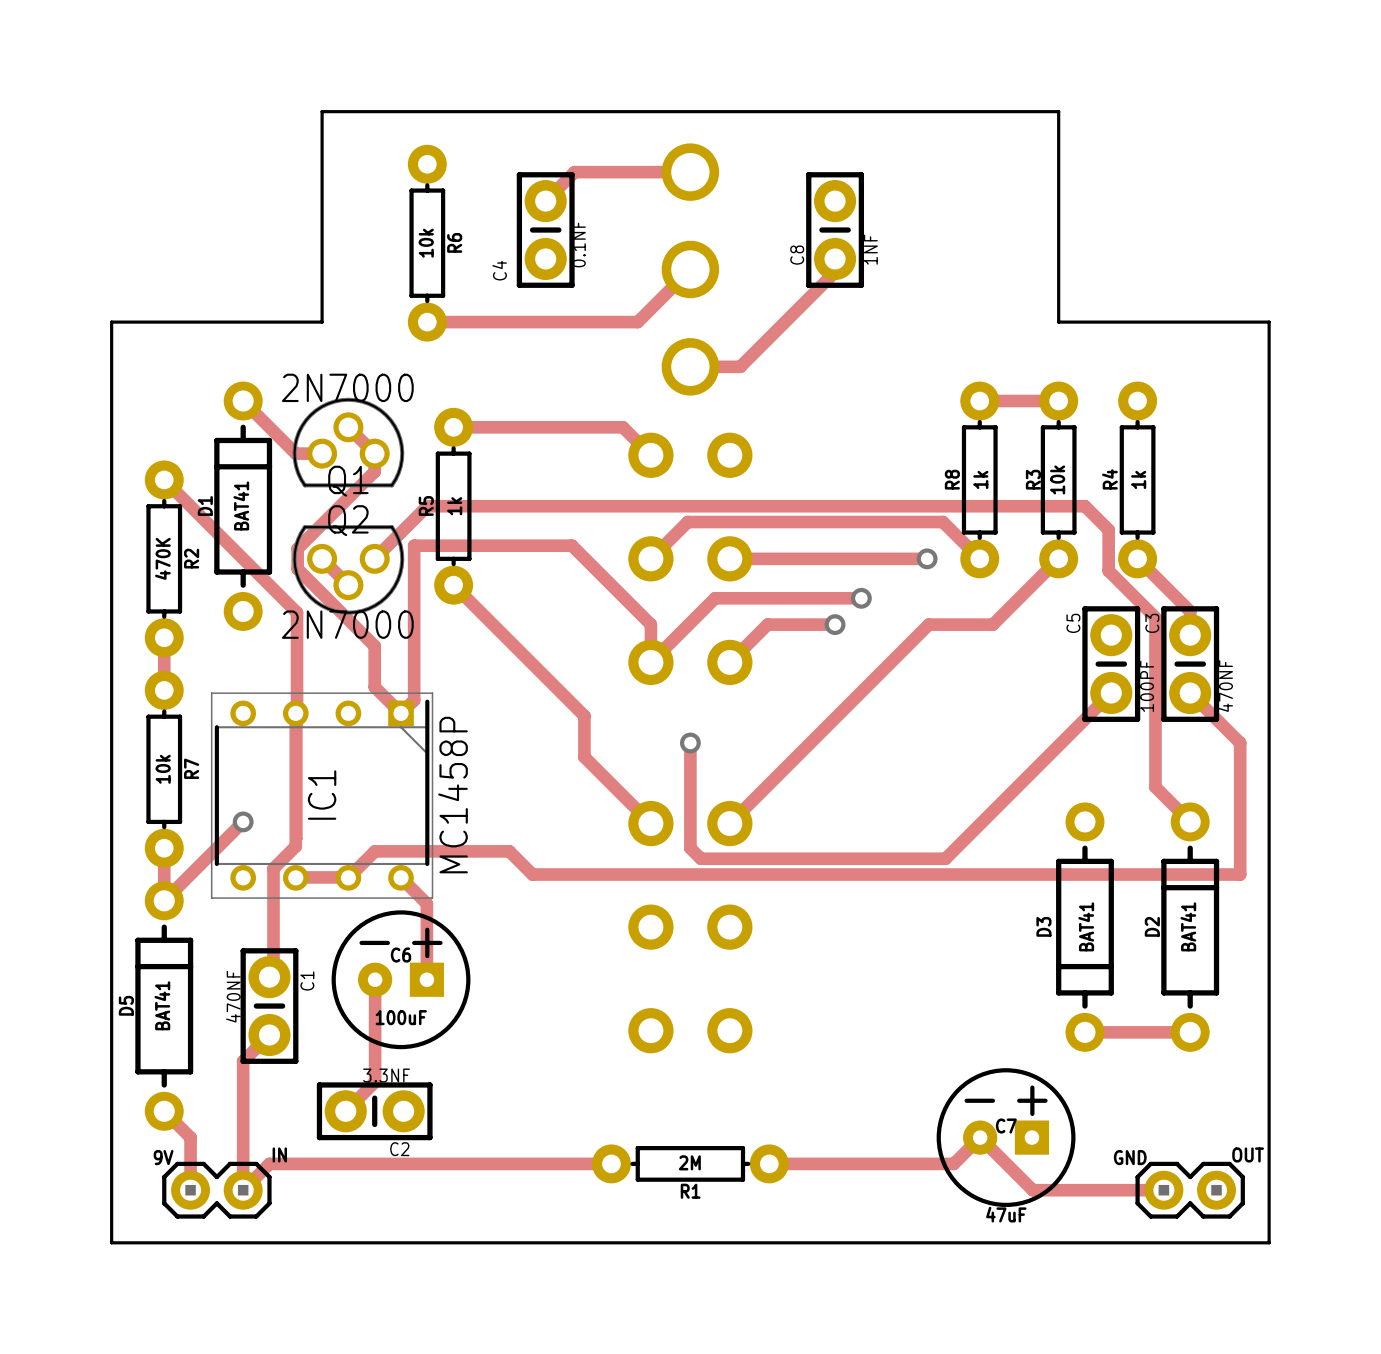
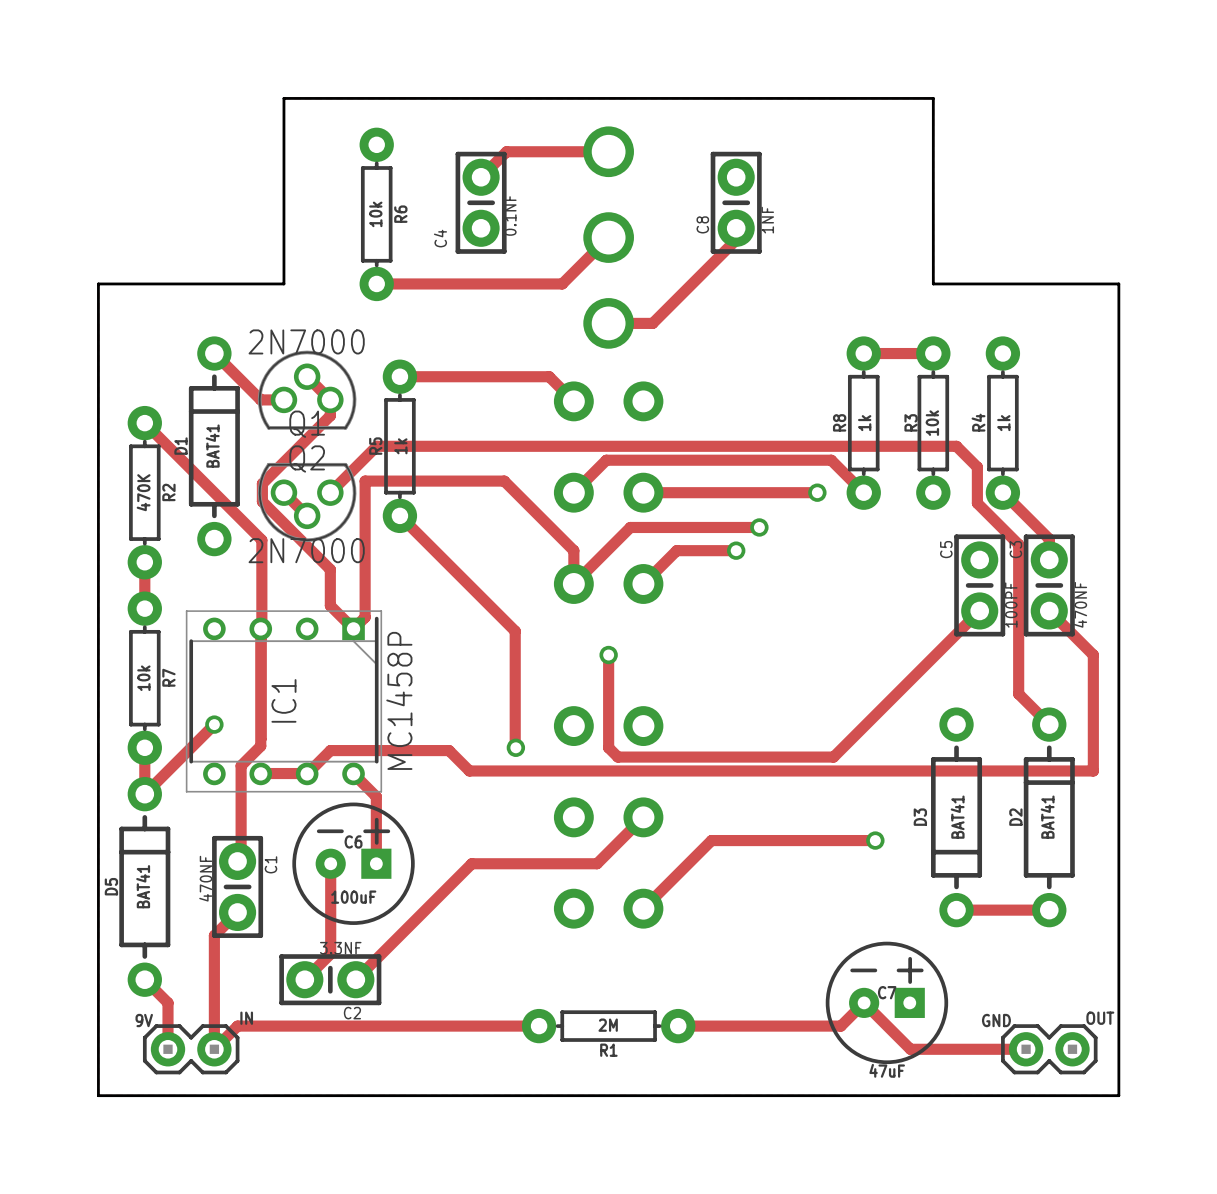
track: (1058, 558) (992, 624) (928, 624) (729, 823) -> none
track: (584, 757) (650, 823) -> (515, 667) (515, 747)
via: none -> (515, 747)
track: none -> (643, 817) (597, 863) (471, 863) (355, 979)
track: none -> (875, 840) (711, 840) (643, 908)
via: none -> (875, 840)

